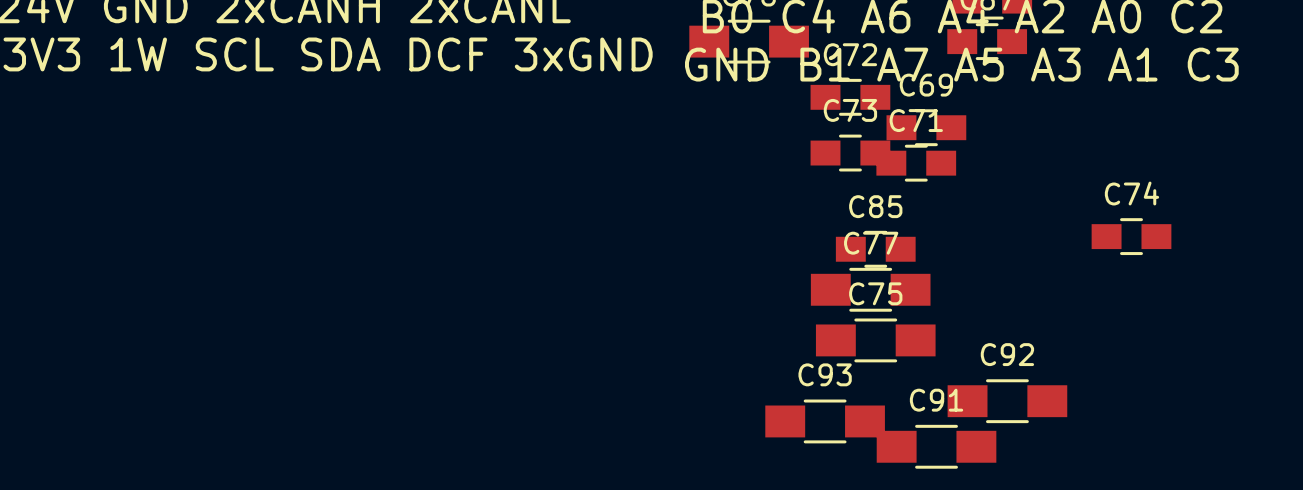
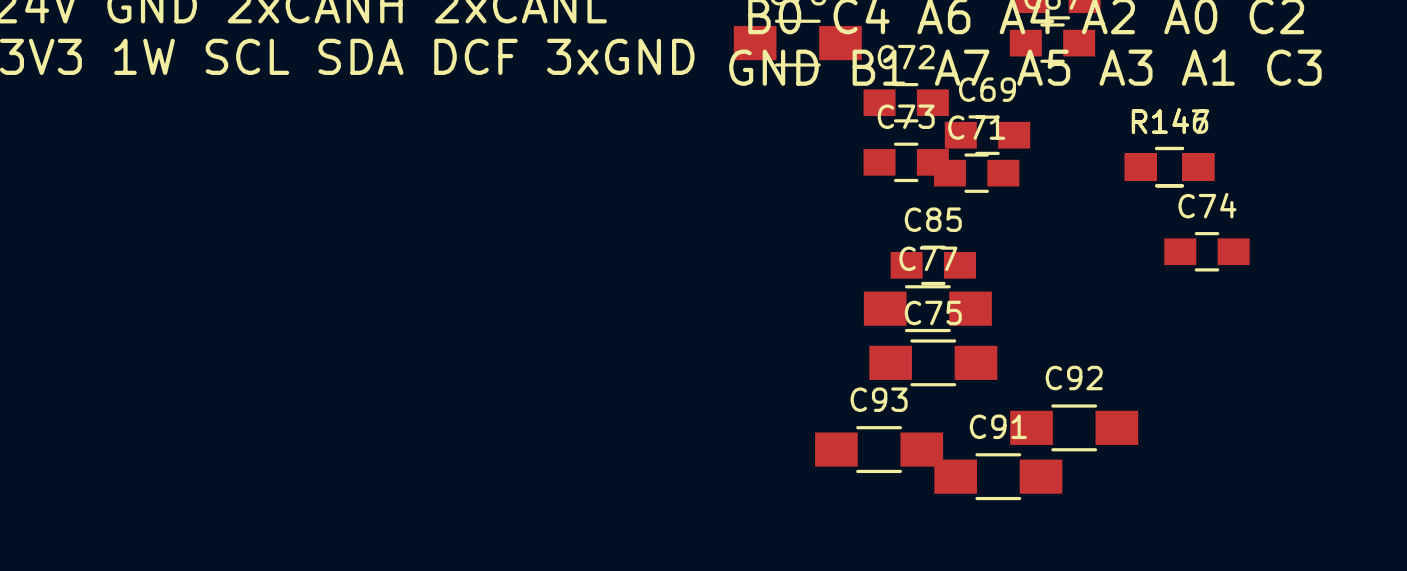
part: none -> (1169, 167)
part: none -> (1169, 167)

